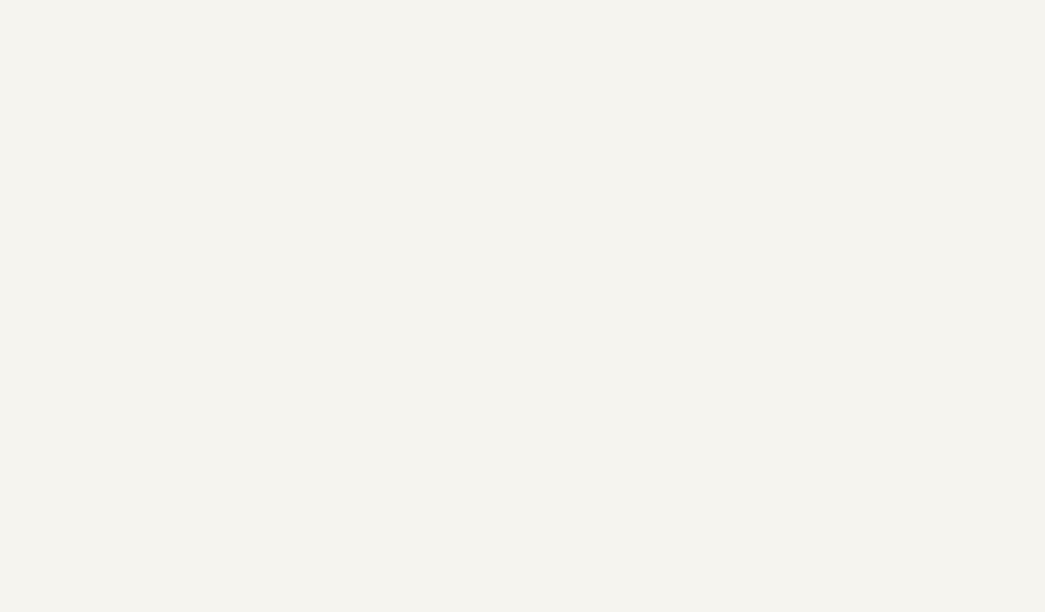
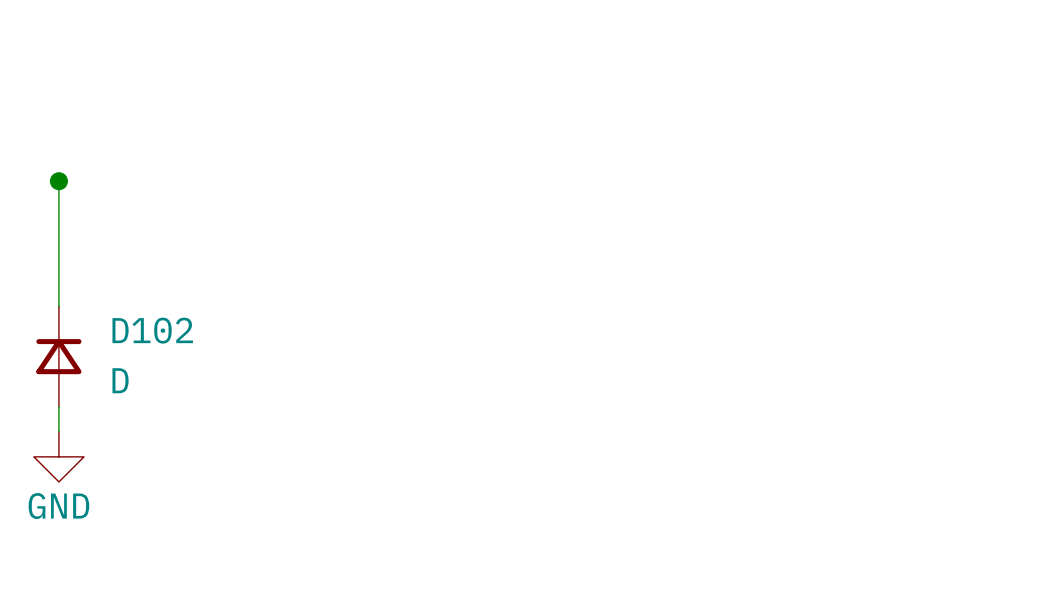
wire: none -> (58, 181) (58, 306)
junction: none -> (58, 181)
D102: none -> D (58, 356)
wire: none -> (58, 406) (58, 431)
power symbol: none -> GND (58, 456)

